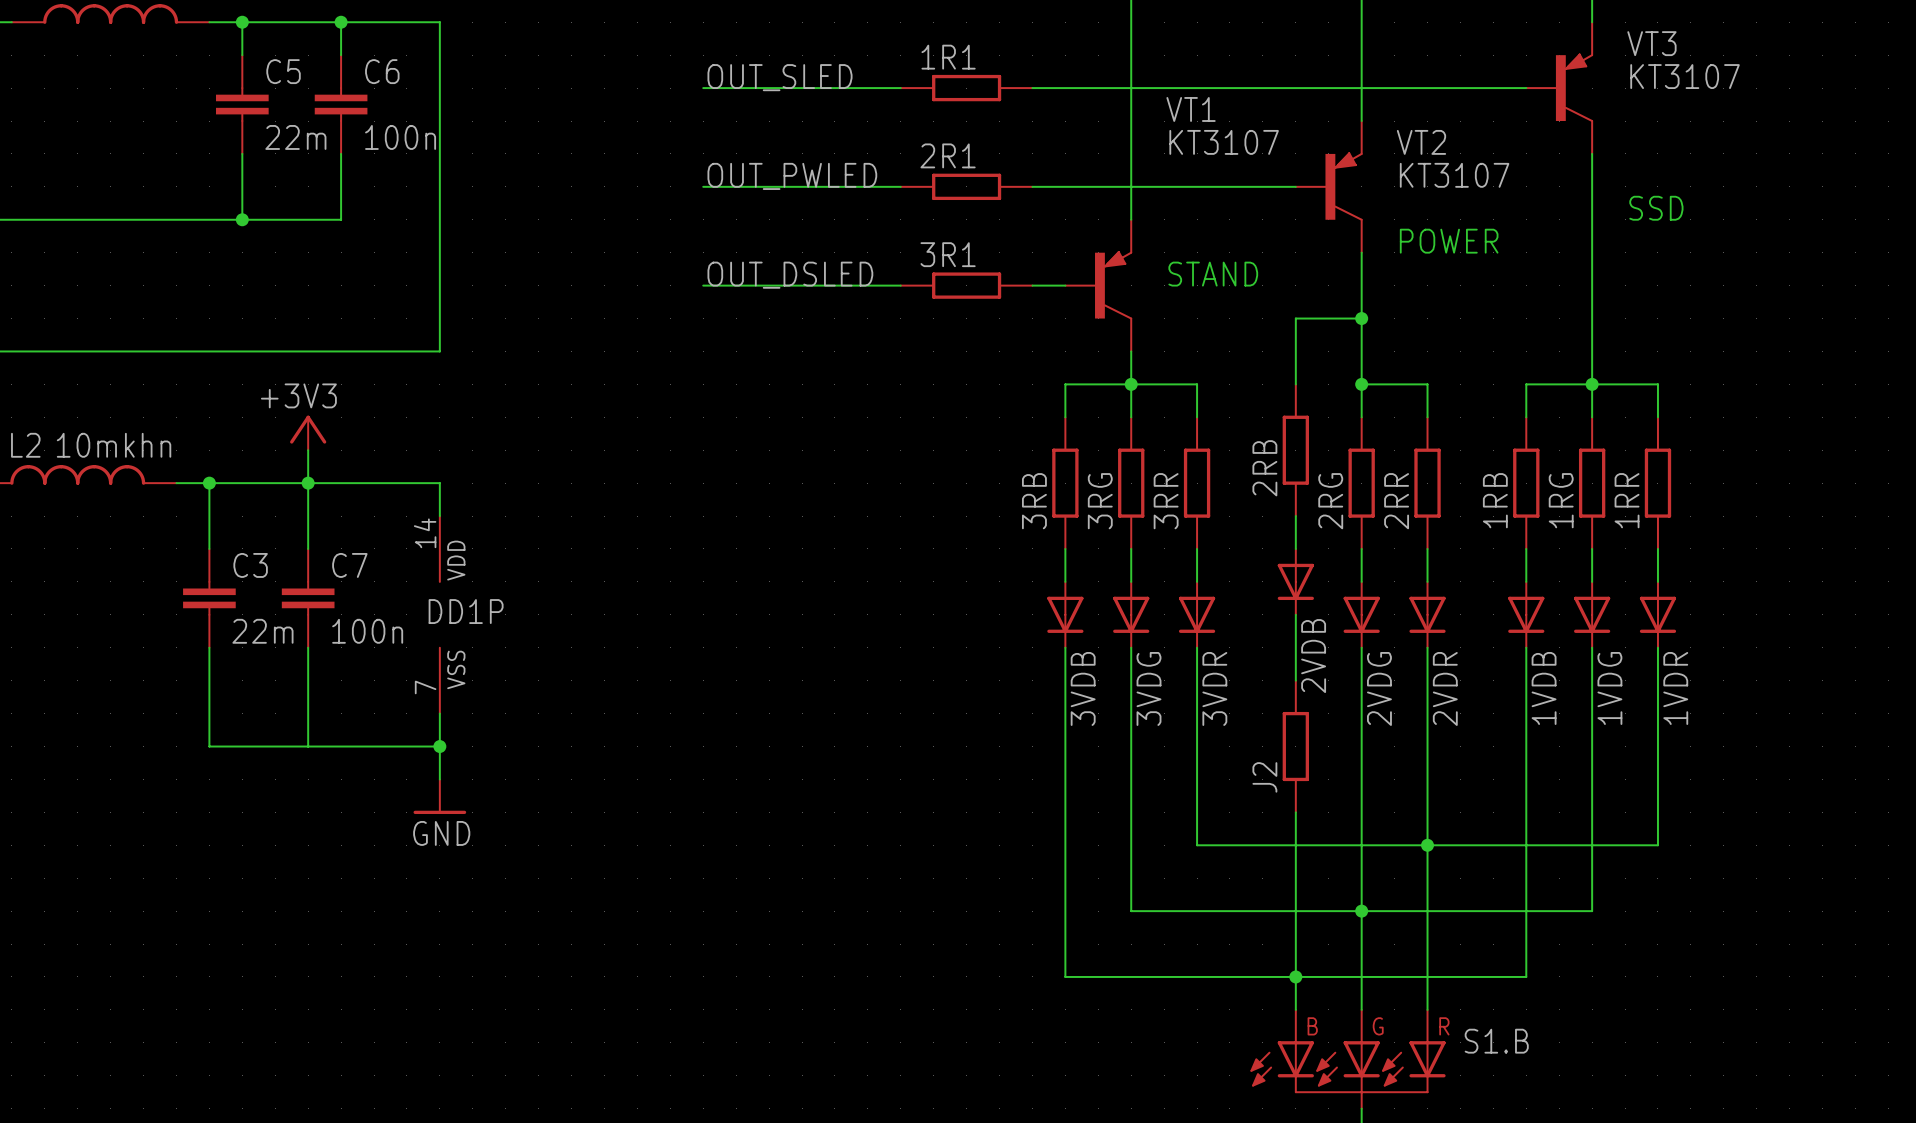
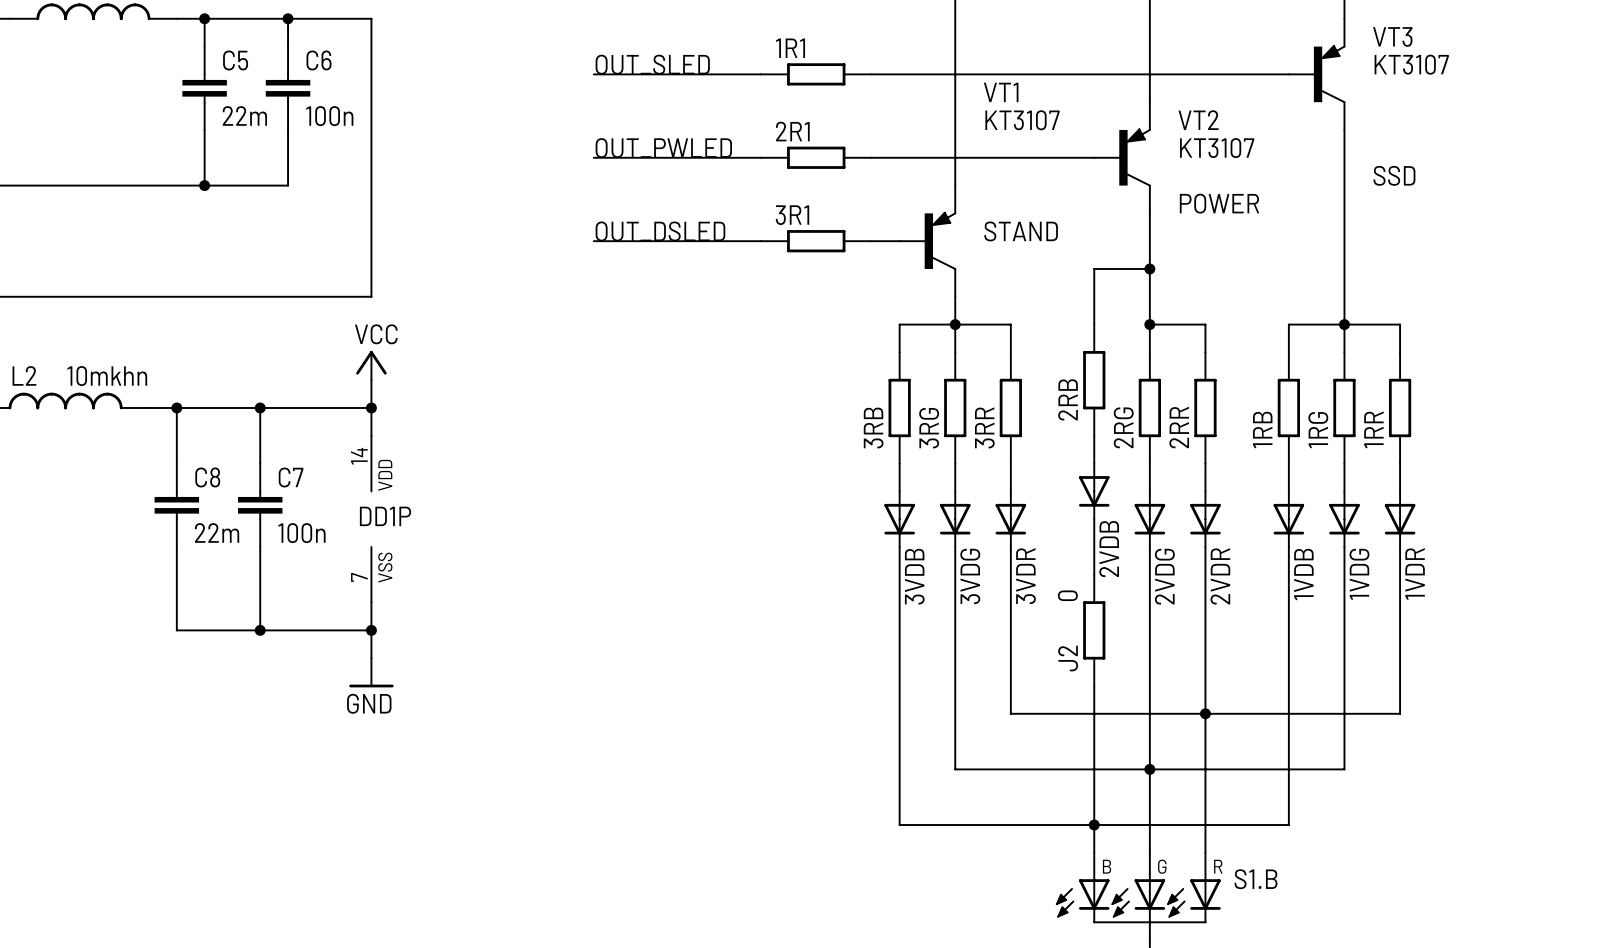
power symbol: +3V3 (308, 432) -> none
power symbol: none -> VCC (371, 365)
wire: (308, 450) (308, 483) -> (371, 380) (371, 407)
junction: none -> (371, 407)
C3 name: C3 (250, 565) -> C8 (207, 477)
J2 value: none -> 0 (1067, 595)
junction: none -> (260, 630)

